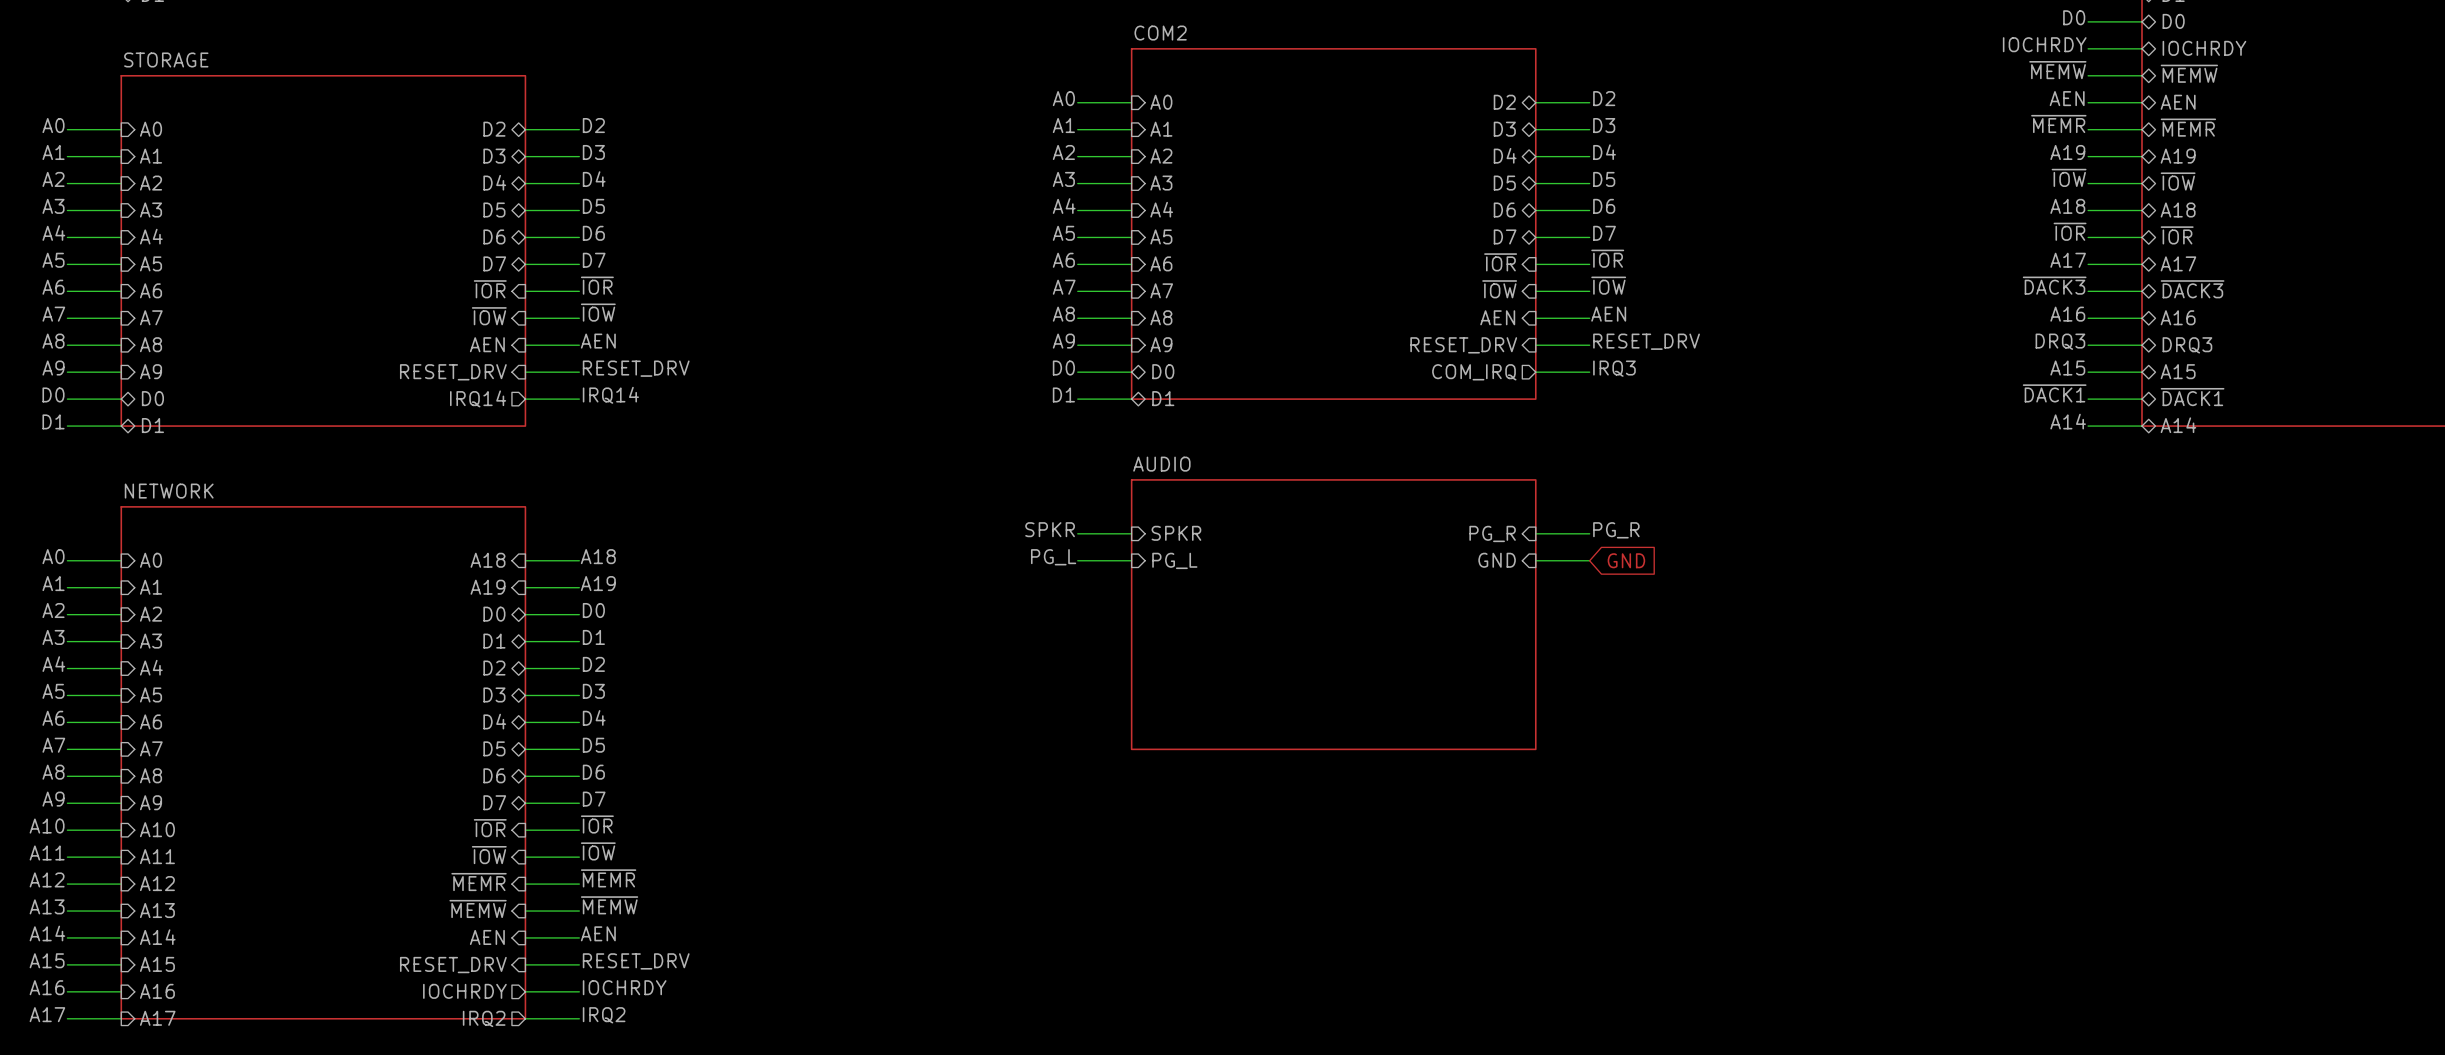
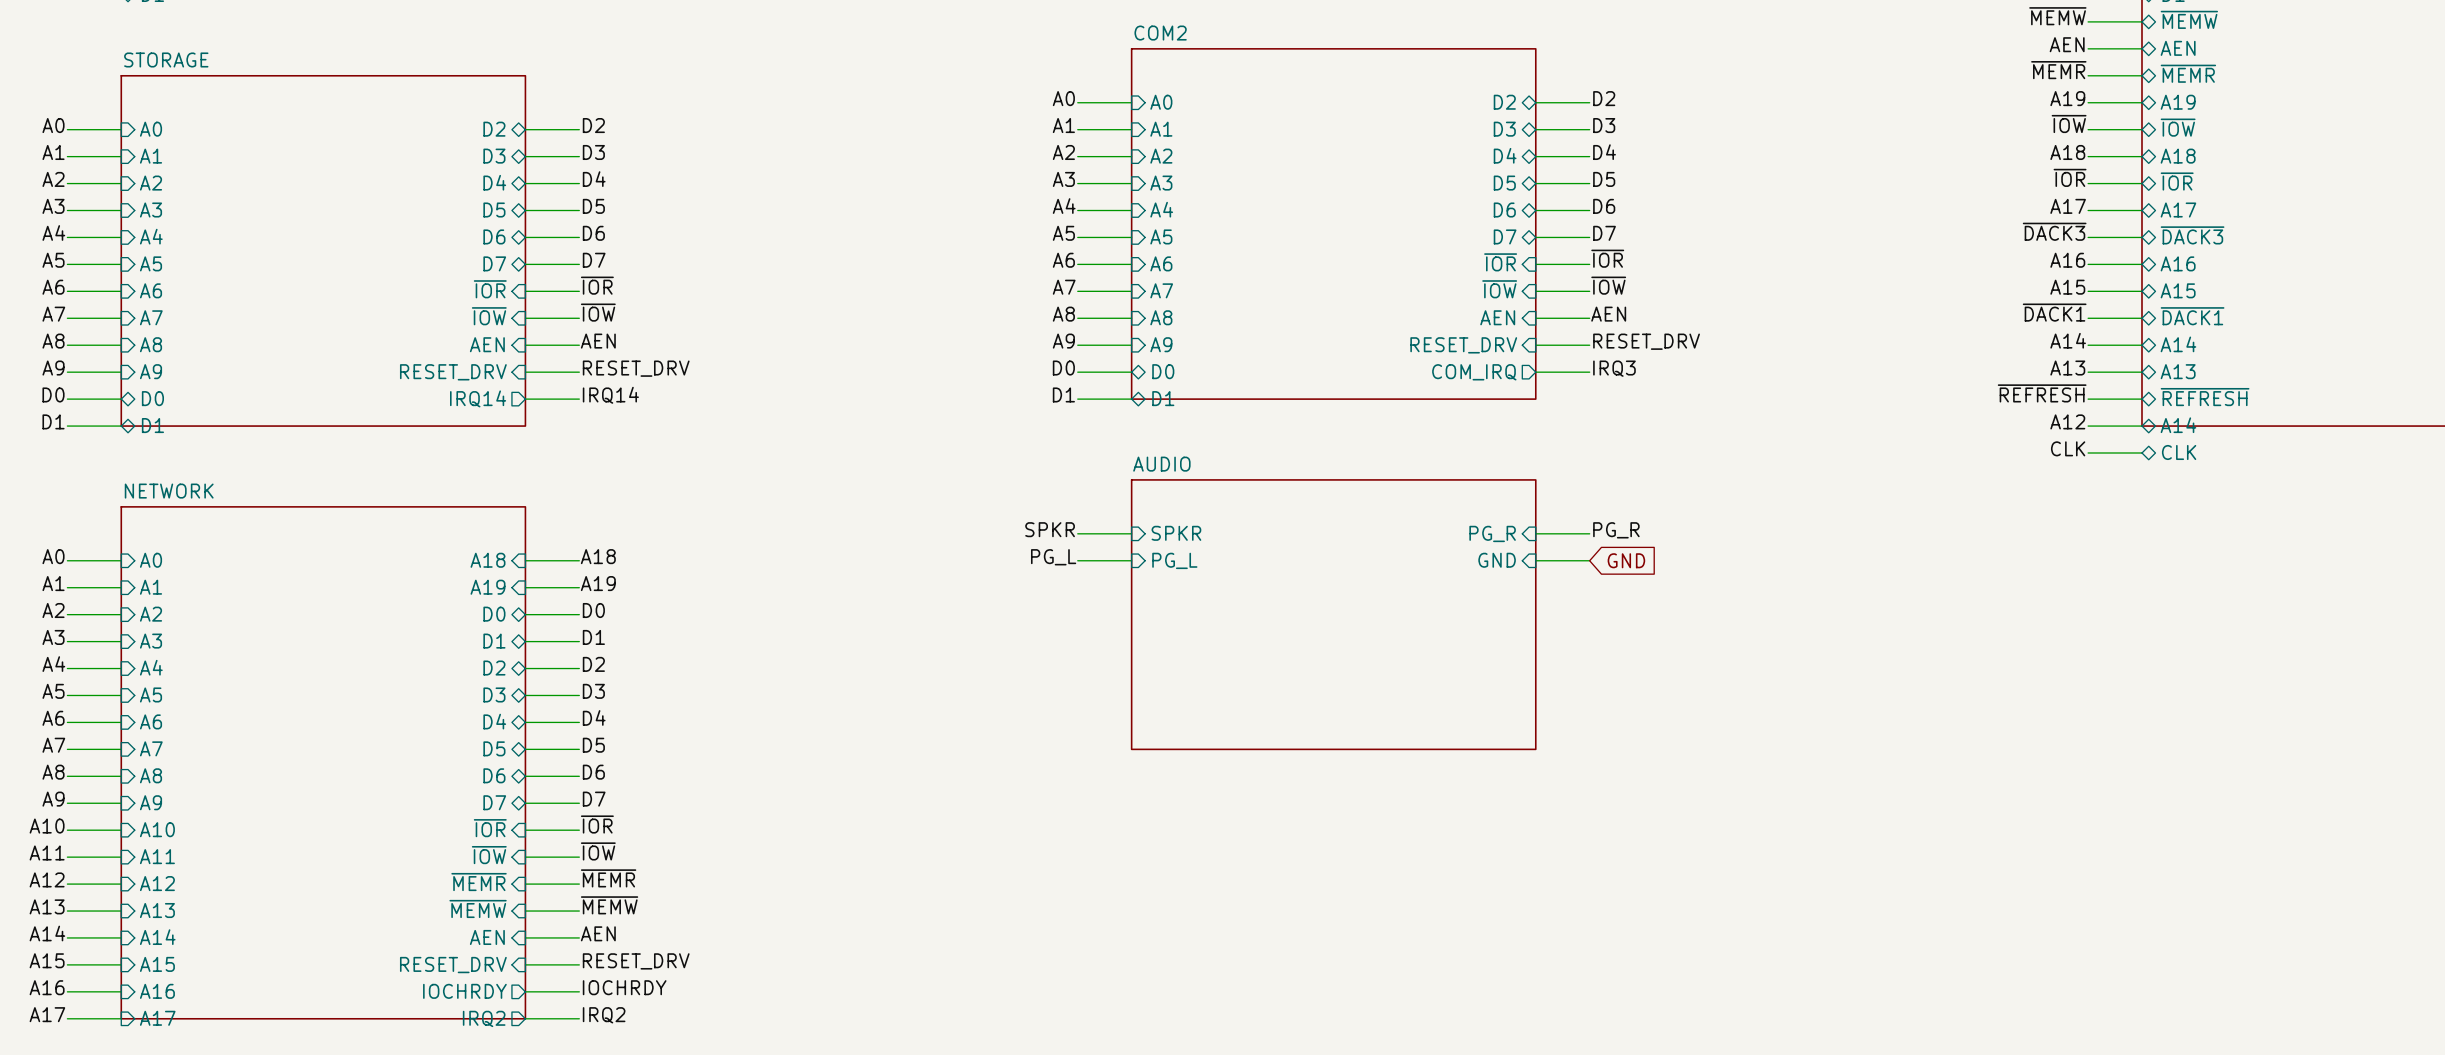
label: D0 (2074, 17) -> ~{MEMW} (2057, 16)
sheet pin: D0 (2173, 21) -> ~{MEMW} (2189, 19)
label: IOCHRDY (2044, 44) -> AEN (2067, 44)
sheet pin: IOCHRDY (2204, 48) -> AEN (2178, 48)
label: ~{MEMW} (2057, 70) -> ~{MEMR} (2058, 70)
sheet pin: ~{MEMW} (2189, 73) -> ~{MEMR} (2188, 73)
label: AEN (2067, 98) -> A19 (2067, 98)
sheet pin: AEN (2178, 102) -> A19 (2178, 102)
label: ~{MEMR} (2058, 123) -> ~{IOW} (2069, 123)
sheet pin: ~{MEMR} (2188, 127) -> ~{IOW} (2178, 127)
label: A19 (2067, 152) -> A18 (2067, 152)
sheet pin: A19 (2178, 156) -> A18 (2178, 156)
label: ~{IOW} (2069, 177) -> ~{IOR} (2070, 177)
sheet pin: ~{IOW} (2178, 181) -> ~{IOR} (2177, 181)
label: A18 (2067, 206) -> A17 (2068, 206)
sheet pin: A18 (2178, 210) -> A17 (2178, 210)
label: ~{IOR} (2070, 231) -> ~{DACK3} (2054, 231)
sheet pin: ~{IOR} (2177, 235) -> ~{DACK3} (2192, 235)
label: A17 (2068, 260) -> A16 (2067, 260)
sheet pin: A17 (2178, 263) -> A16 (2178, 263)
label: ~{DACK3} (2054, 285) -> A15 (2067, 287)
sheet pin: ~{DACK3} (2192, 289) -> A15 (2178, 290)
label: A16 (2067, 314) -> ~{DACK1} (2054, 312)
sheet pin: A16 (2178, 317) -> ~{DACK1} (2192, 316)
label: DRQ3 (2060, 341) -> A14 (2068, 340)
sheet pin: DRQ3 (2187, 345) -> A14 (2178, 344)
label: A15 (2067, 368) -> A13 (2067, 368)
sheet pin: A15 (2178, 371) -> A13 (2178, 371)
label: ~{DACK1} (2054, 393) -> ~{REFRESH} (2042, 393)
sheet pin: ~{DACK1} (2192, 397) -> ~{REFRESH} (2205, 397)
label: A14 (2068, 421) -> A12 (2067, 421)
label: none -> CLK (2068, 448)
wire: none -> (2088, 452) (2141, 452)
sheet pin: none -> CLK (2179, 452)

